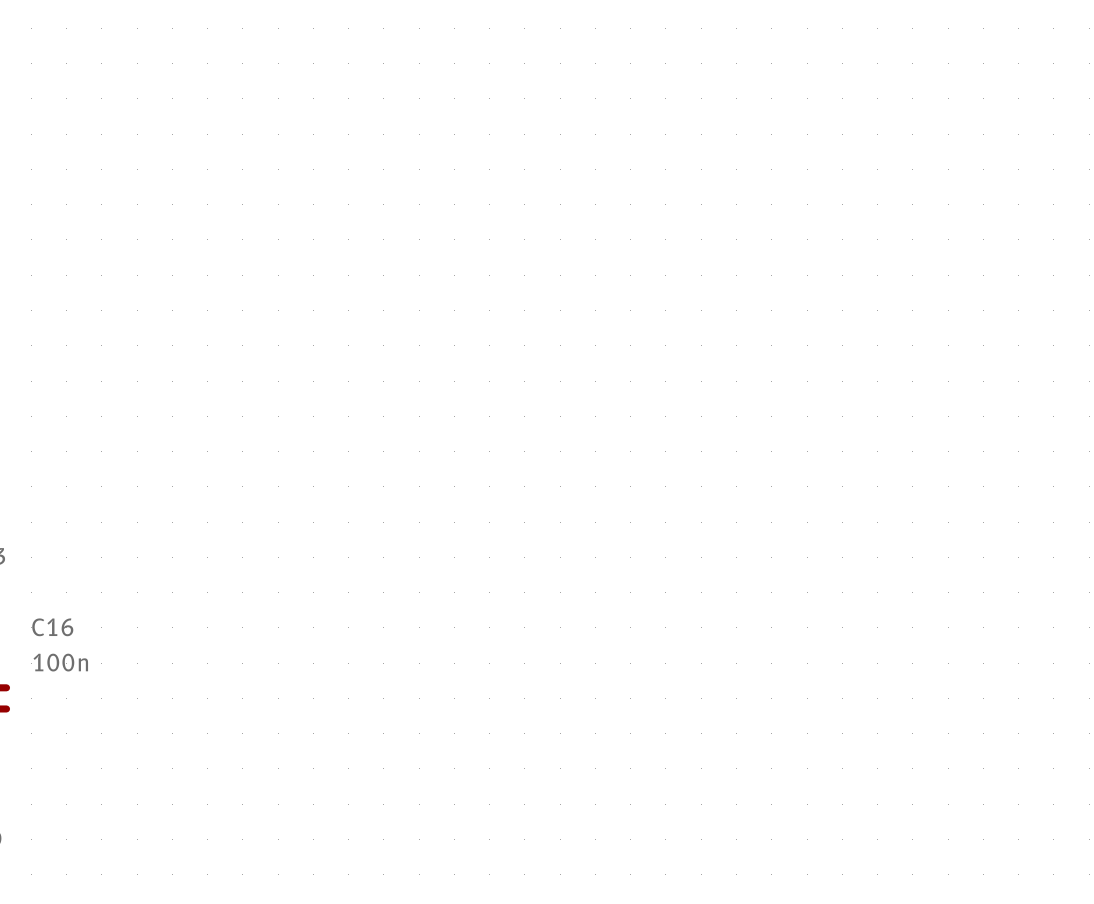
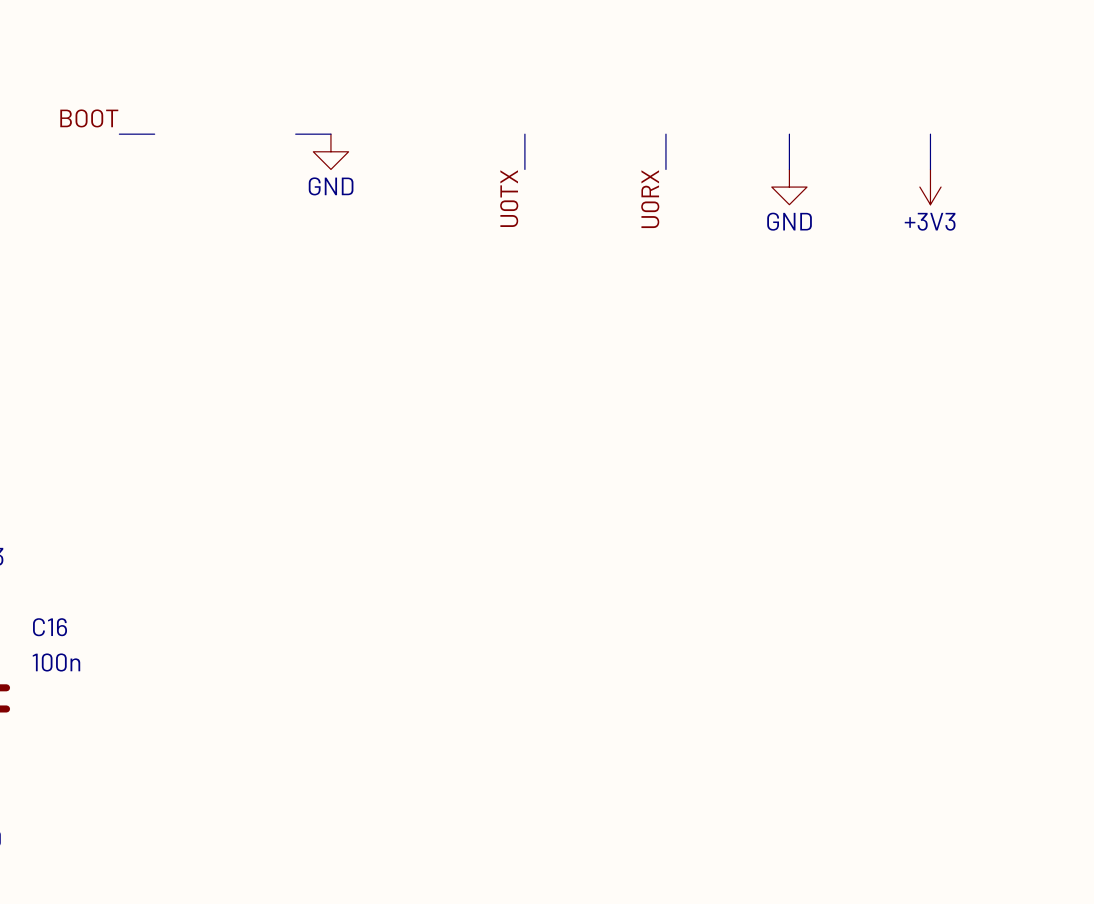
label: none -> BOOT (89, 118)
wire: none -> (119, 134) (154, 134)
wire: none -> (295, 134) (330, 134)
wire: none -> (524, 134) (524, 169)
wire: none -> (665, 134) (665, 169)
wire: none -> (789, 134) (789, 169)
wire: none -> (930, 134) (930, 169)
power symbol: none -> GND (330, 151)
power symbol: none -> GND (789, 187)
power symbol: none -> +3V3 (930, 187)
label: none -> U0TX (509, 198)
label: none -> U0RX (650, 199)

